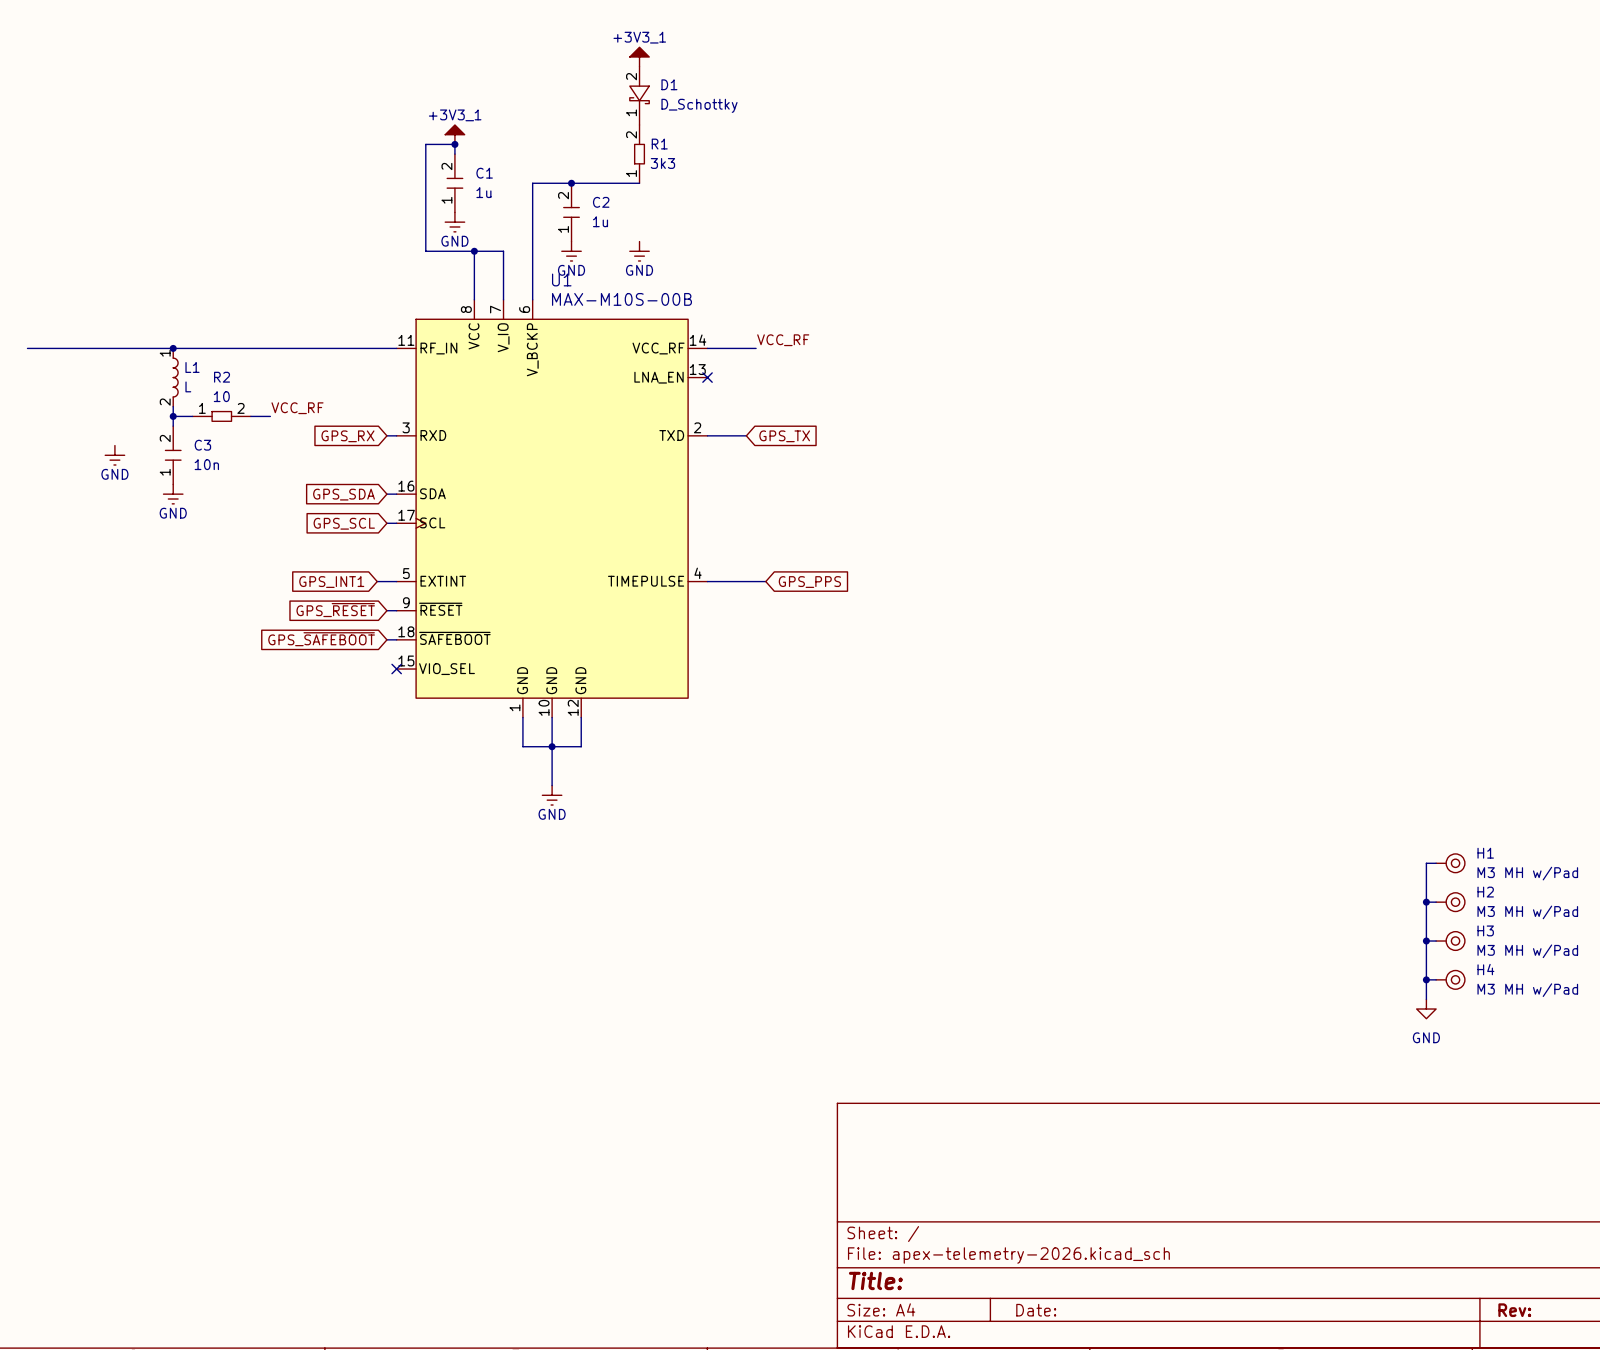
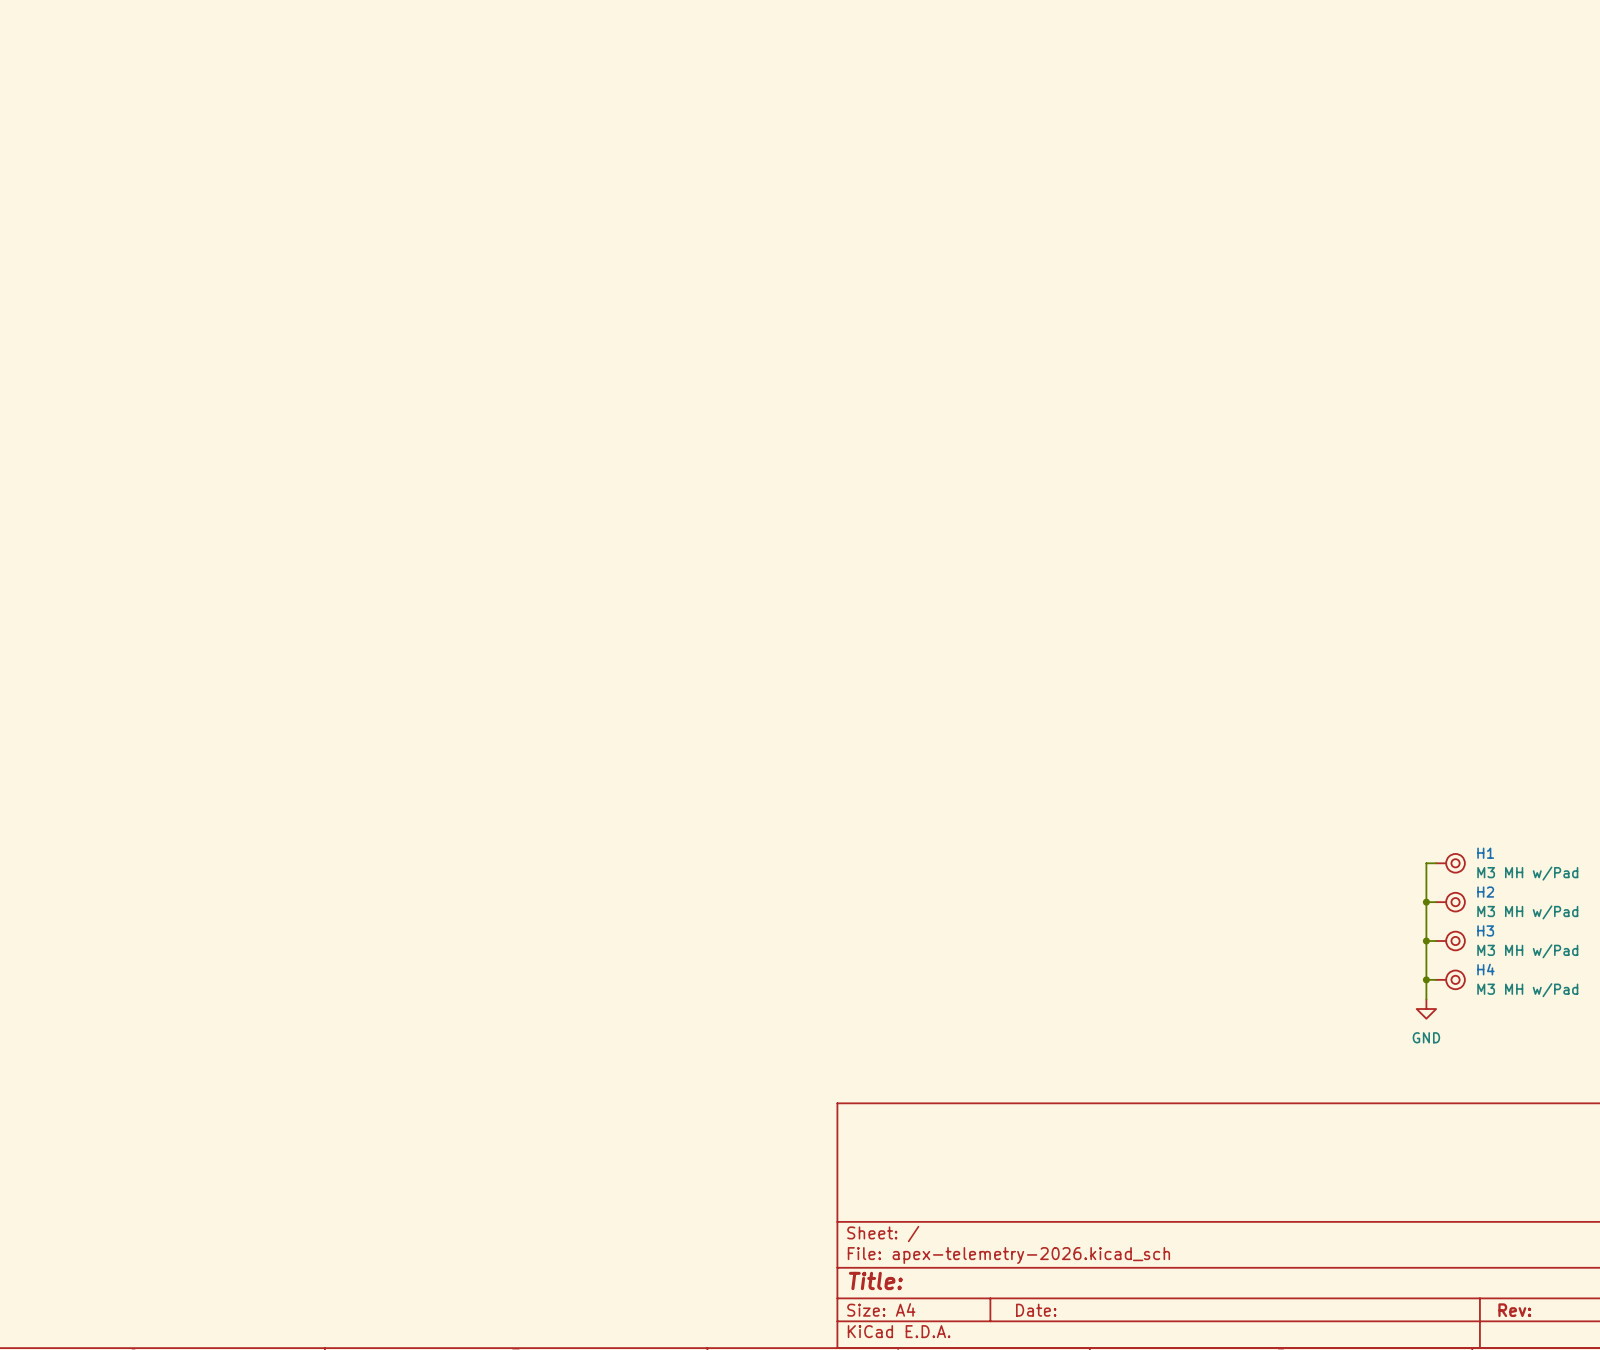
power symbol: +3V3_1 (639, 56) -> none
D1: D_Schottky (639, 95) -> none
power symbol: +3V3_1 (454, 134) -> none
junction: (454, 144) -> none
wire: (454, 154) (454, 144) (425, 144) (425, 251) (503, 251) (503, 299) -> none
R1: 3k3 (639, 154) -> none
C1: 1u (454, 183) -> none
junction: (571, 183) -> none
wire: (639, 183) (532, 183) (532, 299) -> none
C2: 1u (571, 212) -> none
power symbol: GND (454, 222) -> none
wire: (474, 251) (474, 299) -> none
junction: (474, 251) -> none
power symbol: GND (571, 251) -> none
power symbol: GND (639, 251) -> none
label: VCC_RF (783, 340) -> none
wire: (27, 348) (396, 348) -> none
junction: (173, 348) -> none
wire: (707, 348) (756, 348) -> none
L1: L (175, 377) -> none
no-connect mark: (707, 377) -> none
wire: (173, 406) (173, 426) -> none
label: VCC_RF (297, 408) -> none
wire: (173, 416) (192, 416) -> none
junction: (173, 416) -> none
R2: 10 (221, 416) -> none
wire: (250, 416) (270, 416) -> none
wire: (386, 435) (396, 435) -> none
wire: (707, 435) (746, 435) -> none
global label: GPS_RX (347, 436) -> none
global label: GPS_TX (784, 436) -> none
power symbol: GND (114, 455) -> none
C3: 10n (173, 455) -> none
power symbol: GND (173, 494) -> none
global label: GPS_SDA (344, 494) -> none
wire: (386, 494) (396, 494) -> none
U1: MAX-M10S-00B (552, 508) -> none
global label: GPS_SCL (344, 523) -> none
wire: (386, 523) (396, 523) -> none
wire: (377, 581) (396, 581) -> none
wire: (707, 581) (765, 581) -> none
global label: GPS_INT1 (331, 582) -> none
global label: GPS_PPS (809, 582) -> none
global label: GPS_~{RESET} (335, 610) -> none
wire: (386, 610) (396, 610) -> none
global label: GPS_~{SAFEBOOT} (321, 639) -> none
wire: (386, 639) (396, 639) -> none
no-connect mark: (396, 669) -> none
wire: (522, 717) (522, 746) (581, 746) (581, 717) -> none
wire: (552, 717) (552, 785) -> none
junction: (552, 746) -> none
power symbol: GND (552, 795) -> none

